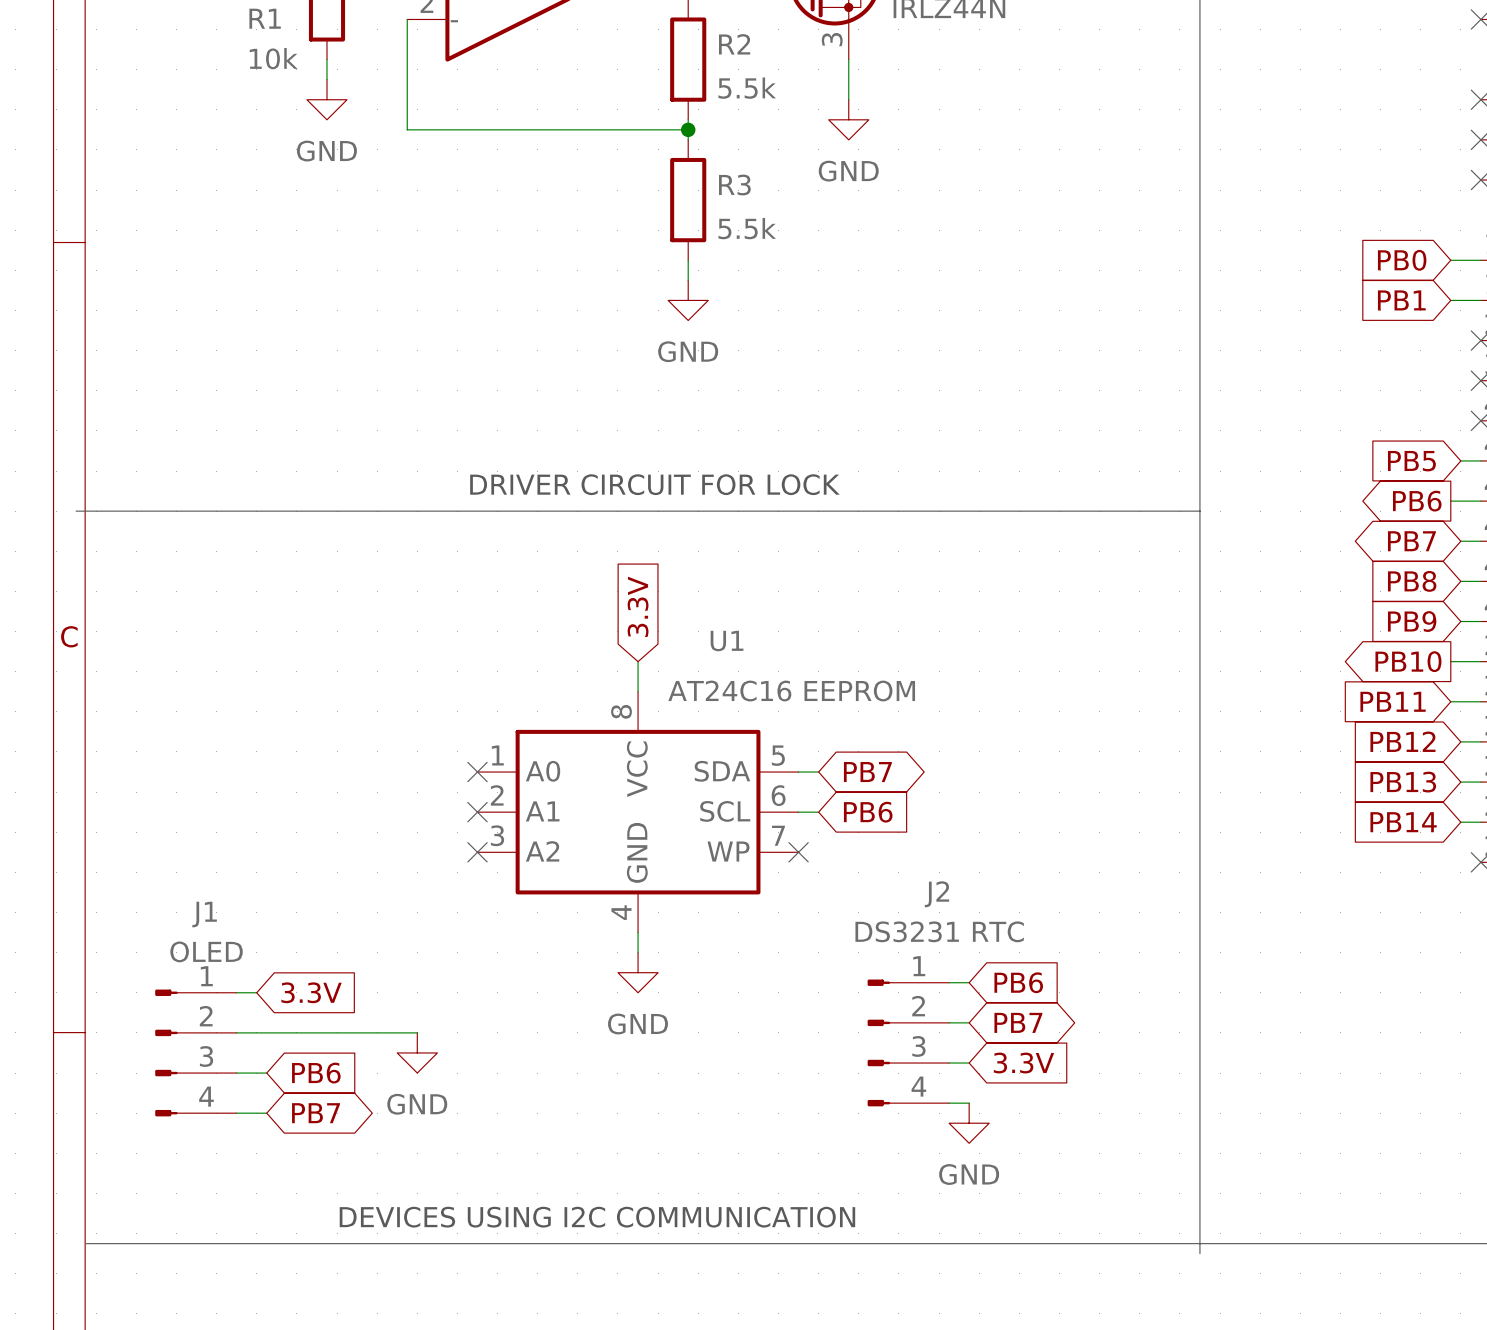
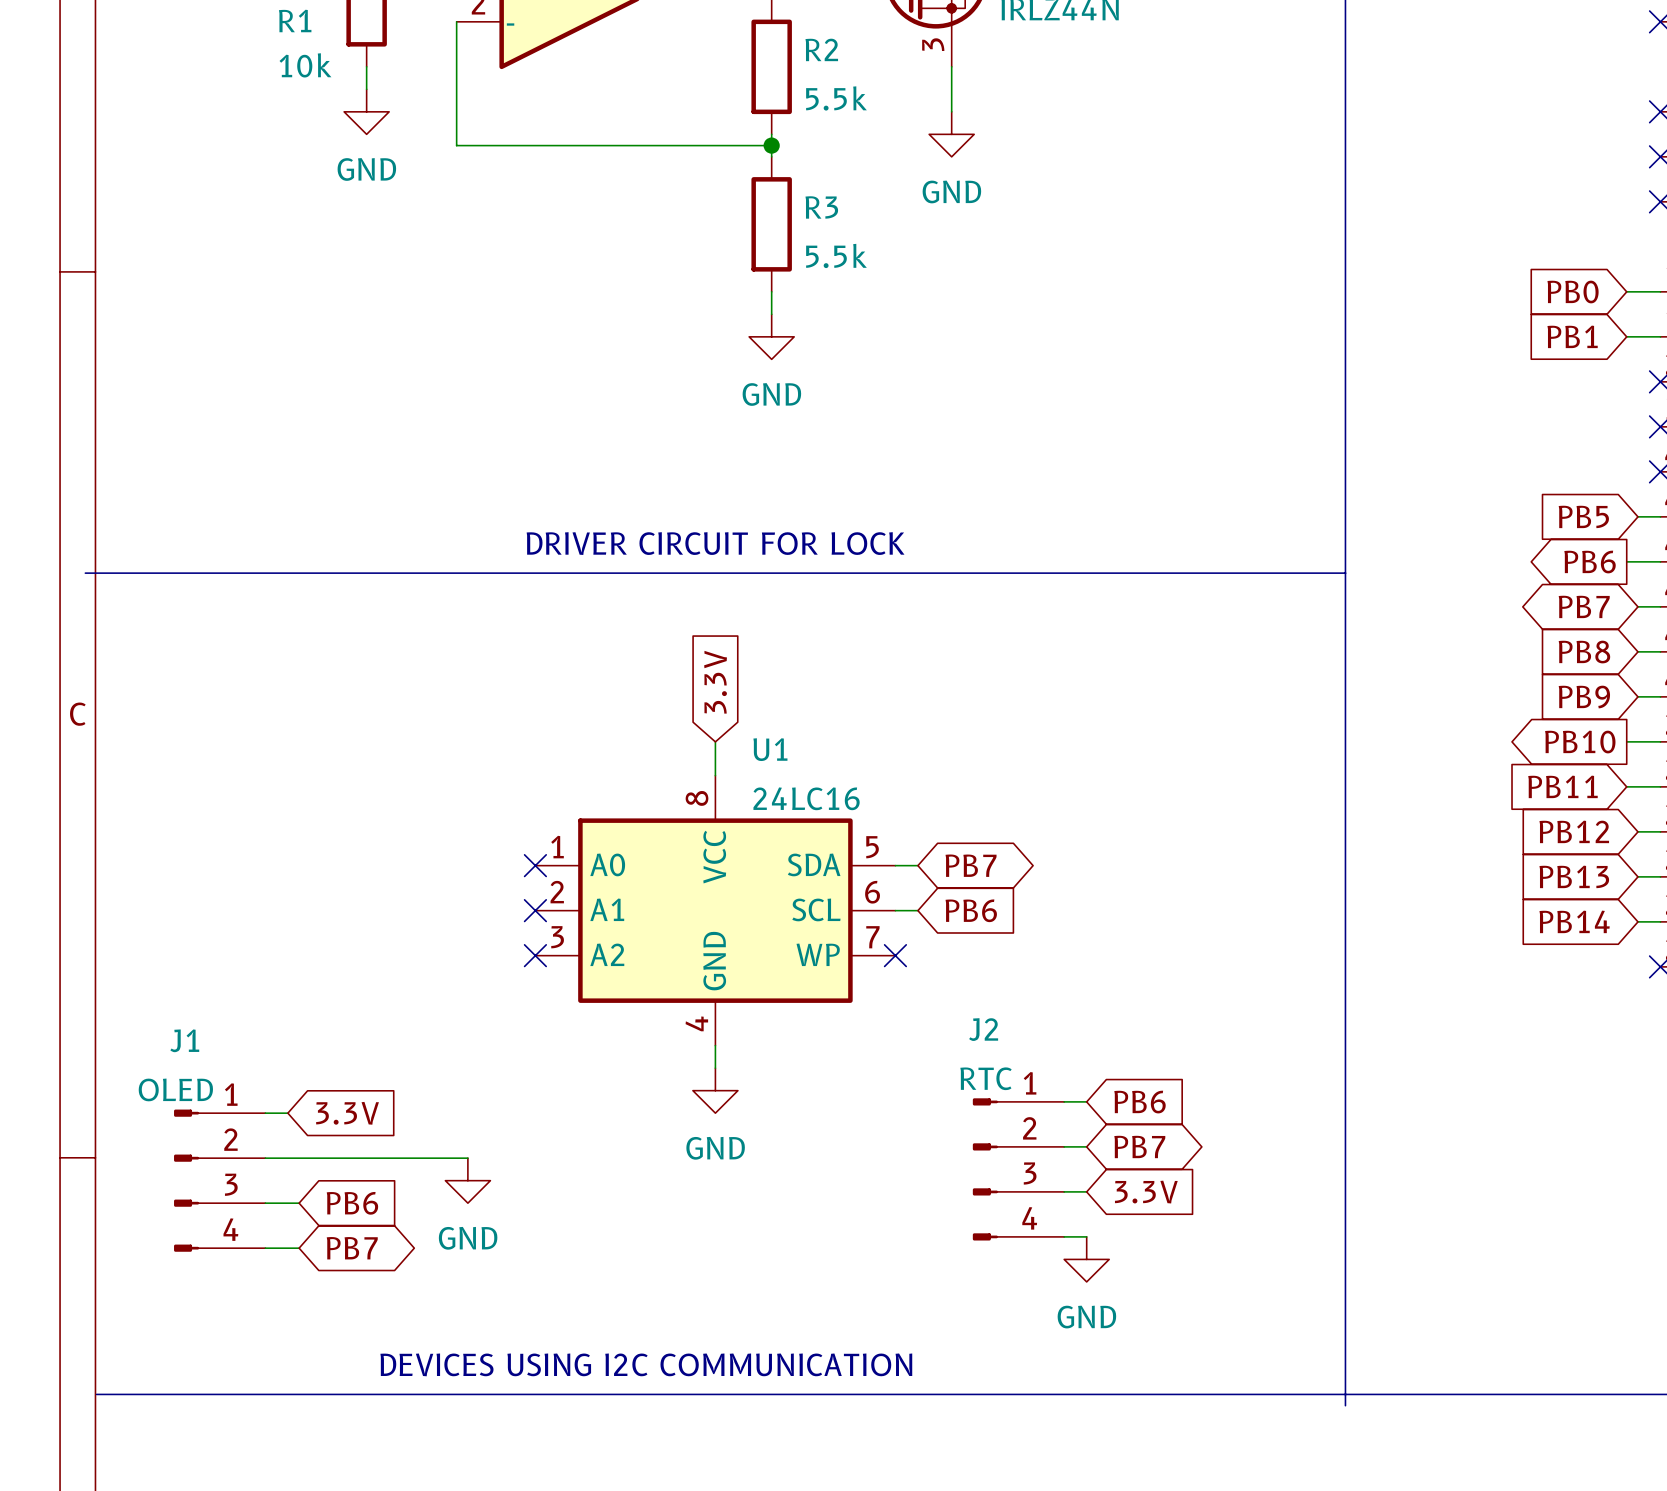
U1 name position: U1 (727, 641) -> U1 (770, 749)
U1 value: AT24C16 EEPROM (791, 691) -> 24LC16 (806, 798)
J2 name position: J2 (936, 894) -> J2 (983, 1029)
J1 name position: J1 (204, 914) -> J1 (184, 1040)
J2 value: DS3231 RTC (939, 931) -> RTC (986, 1078)
J1 value position: OLED (206, 951) -> OLED (175, 1089)

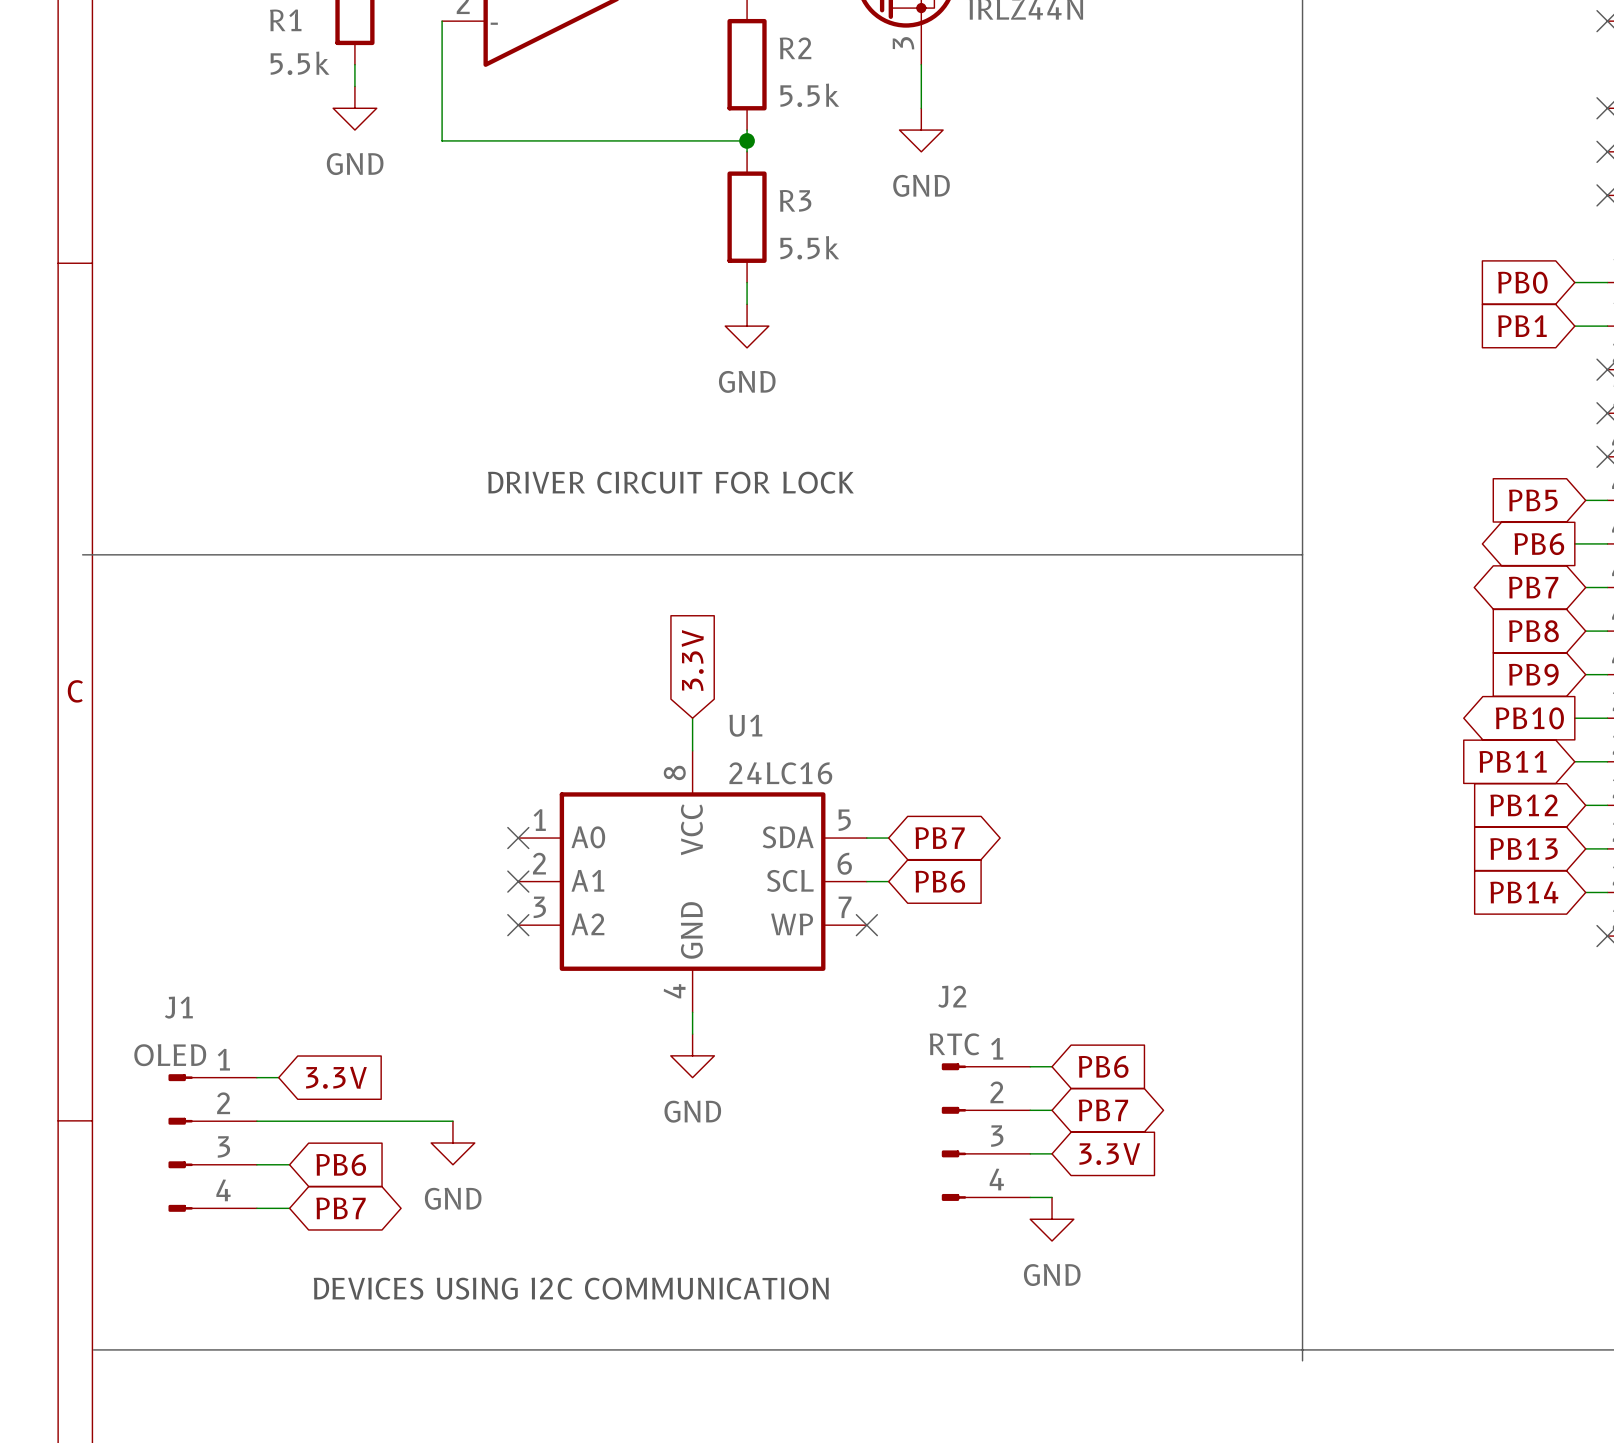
R1 value: 10k (305, 65) -> 5.5k (300, 63)
text position: DRIVER CIRCUIT FOR LOCK (715, 543) -> DRIVER CIRCUIT FOR LOCK (670, 482)
text position: DEVICES USING I2C COMMUNICATION (646, 1364) -> DEVICES USING I2C COMMUNICATION (571, 1288)

